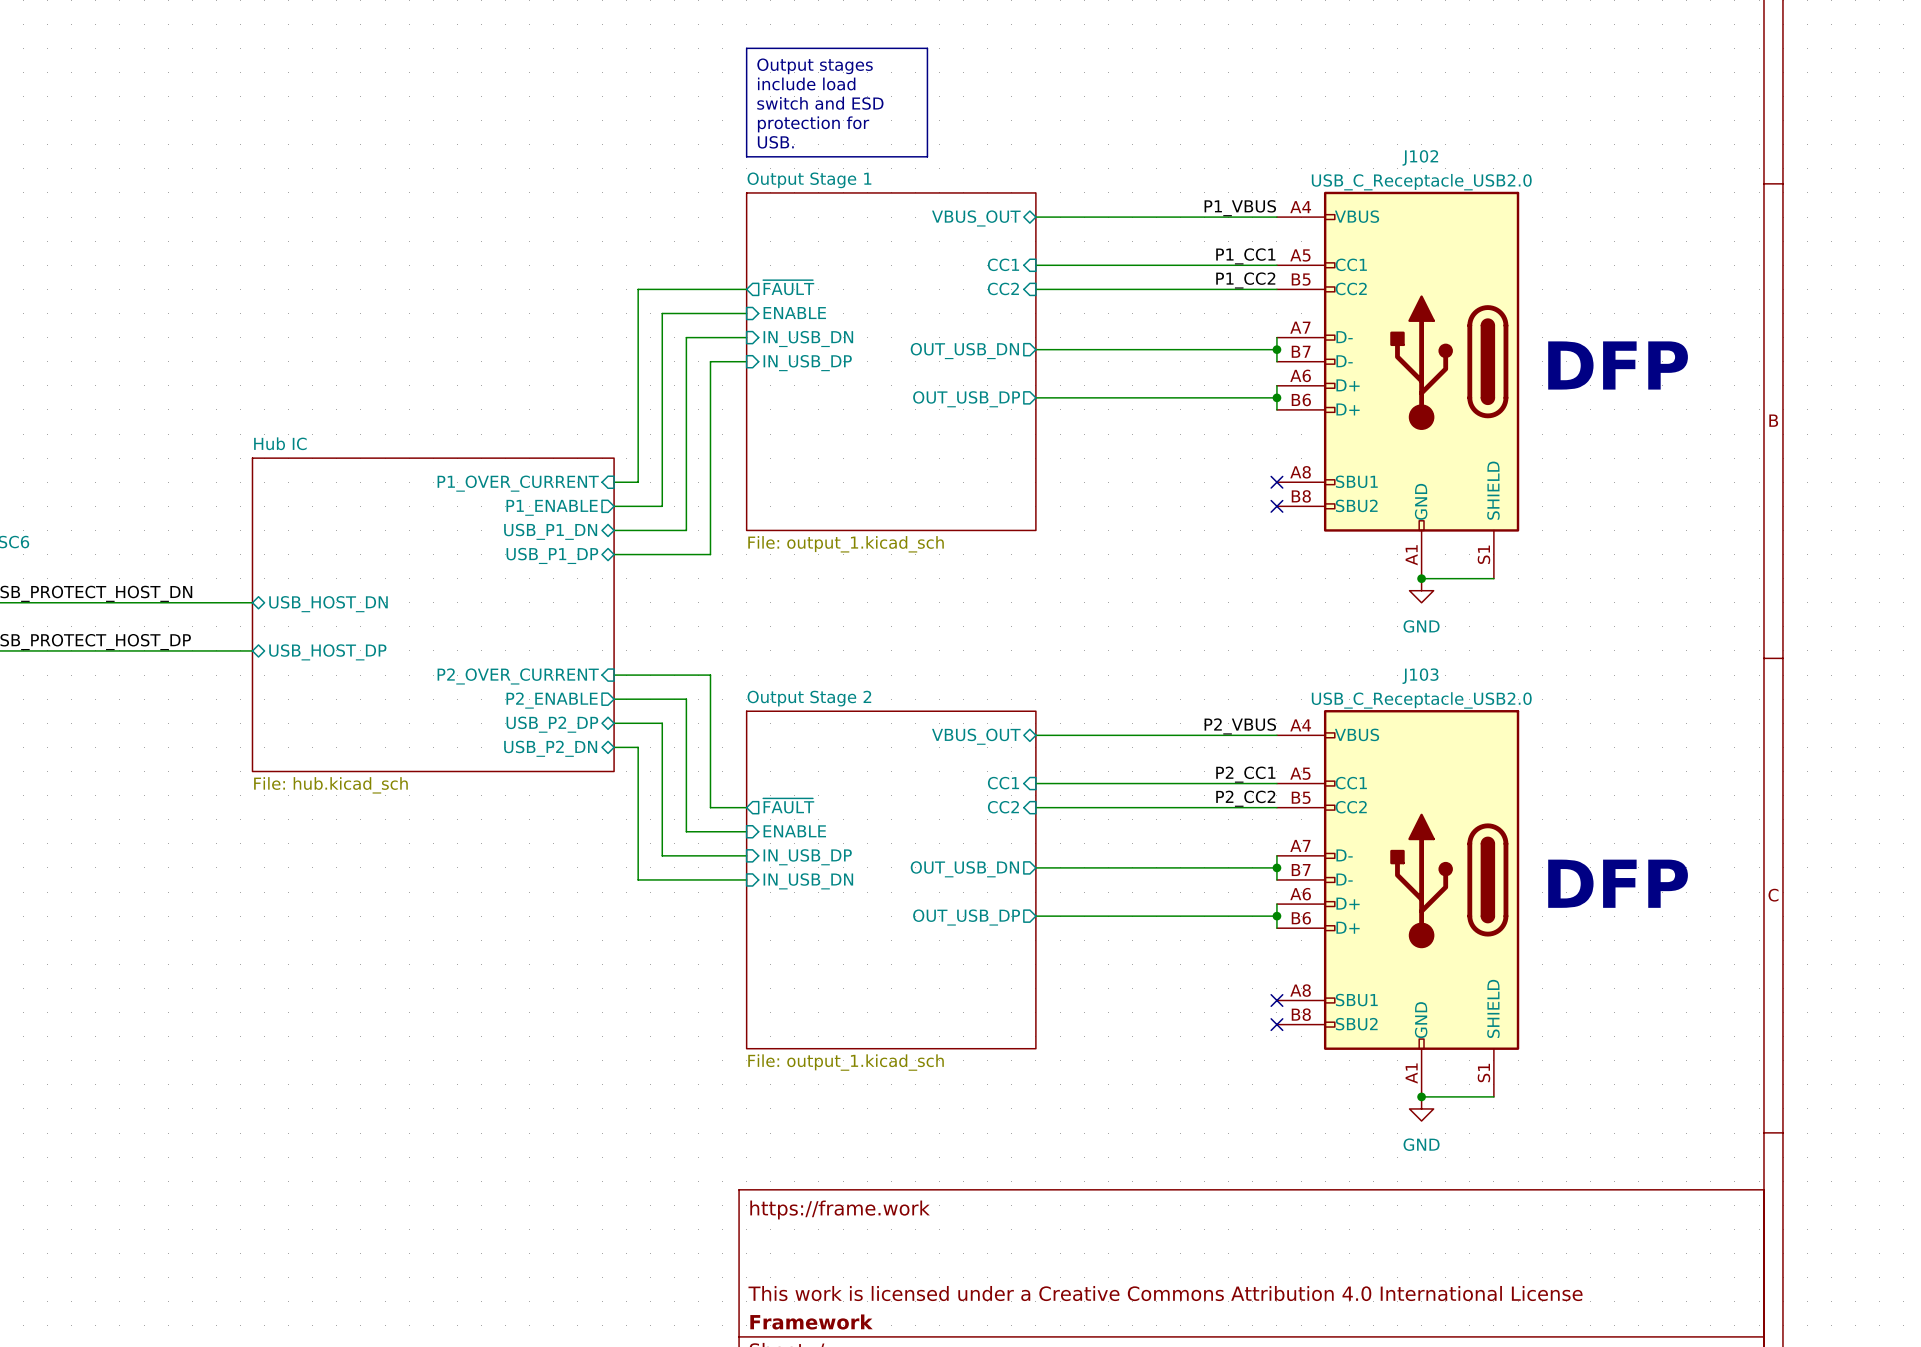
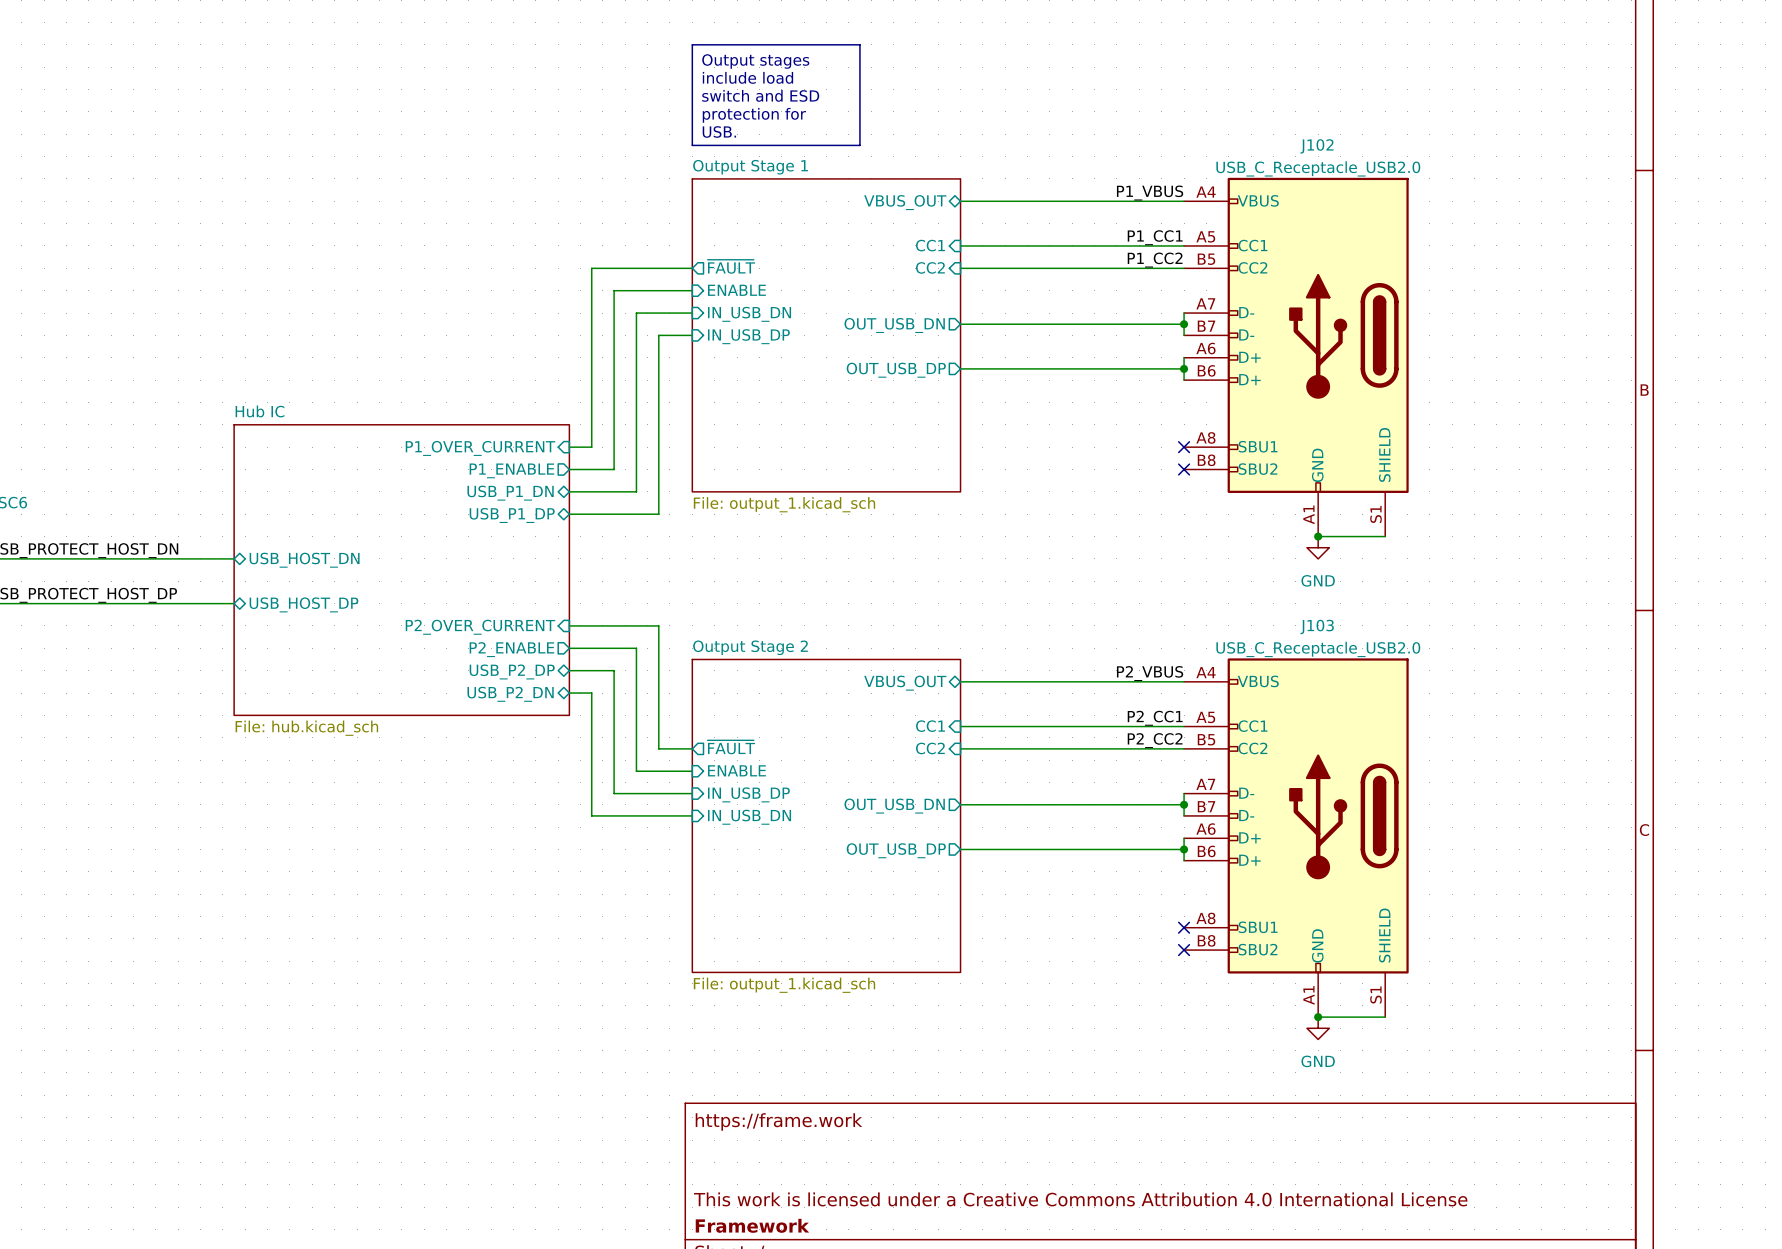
text: DFP (1618, 365) -> none
text: DFP (1618, 883) -> none

